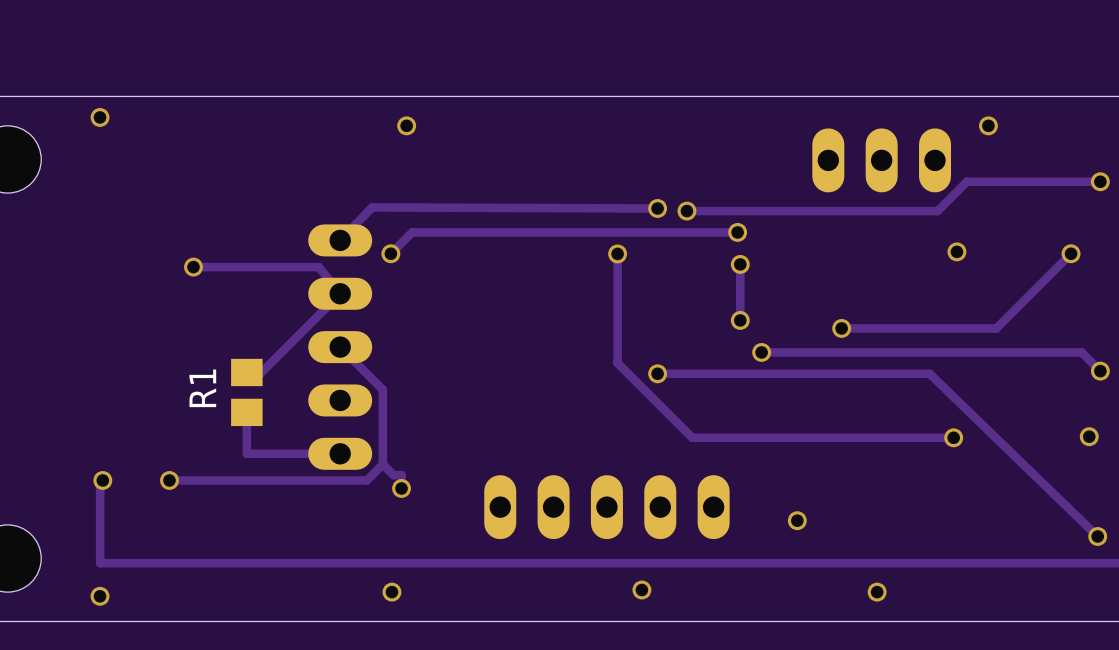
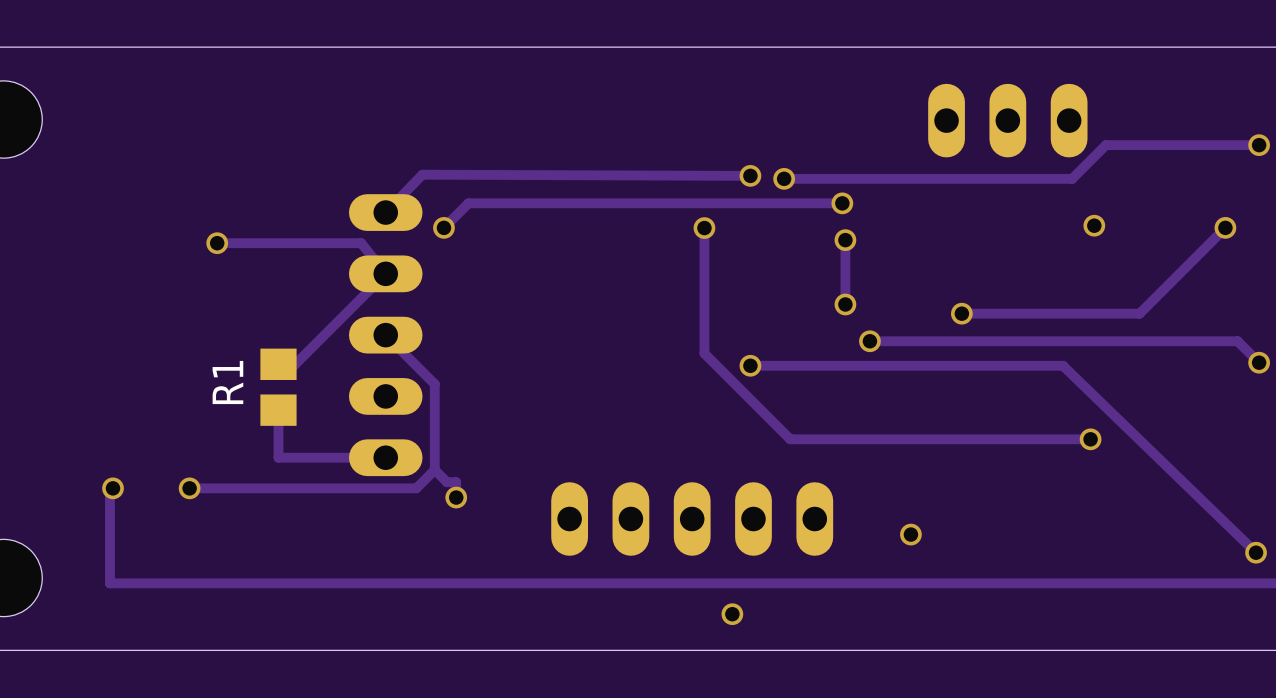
via: (100, 117) -> none
via: (406, 125) -> none
via: (988, 125) -> none
via: (1089, 436) -> none
via: (391, 592) -> none
via: (877, 592) -> none
via: (100, 596) -> none

